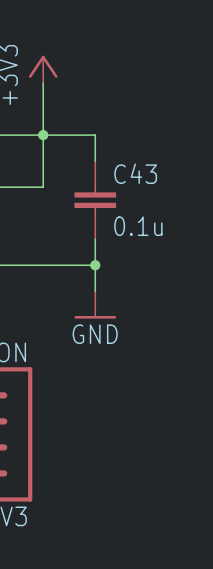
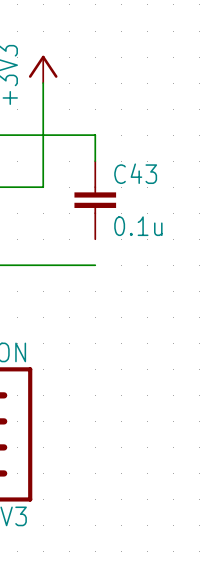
junction: (43, 135) -> none
wire: (95, 239) (95, 291) -> none
junction: (95, 265) -> none
power symbol: GND (95, 304) -> none

